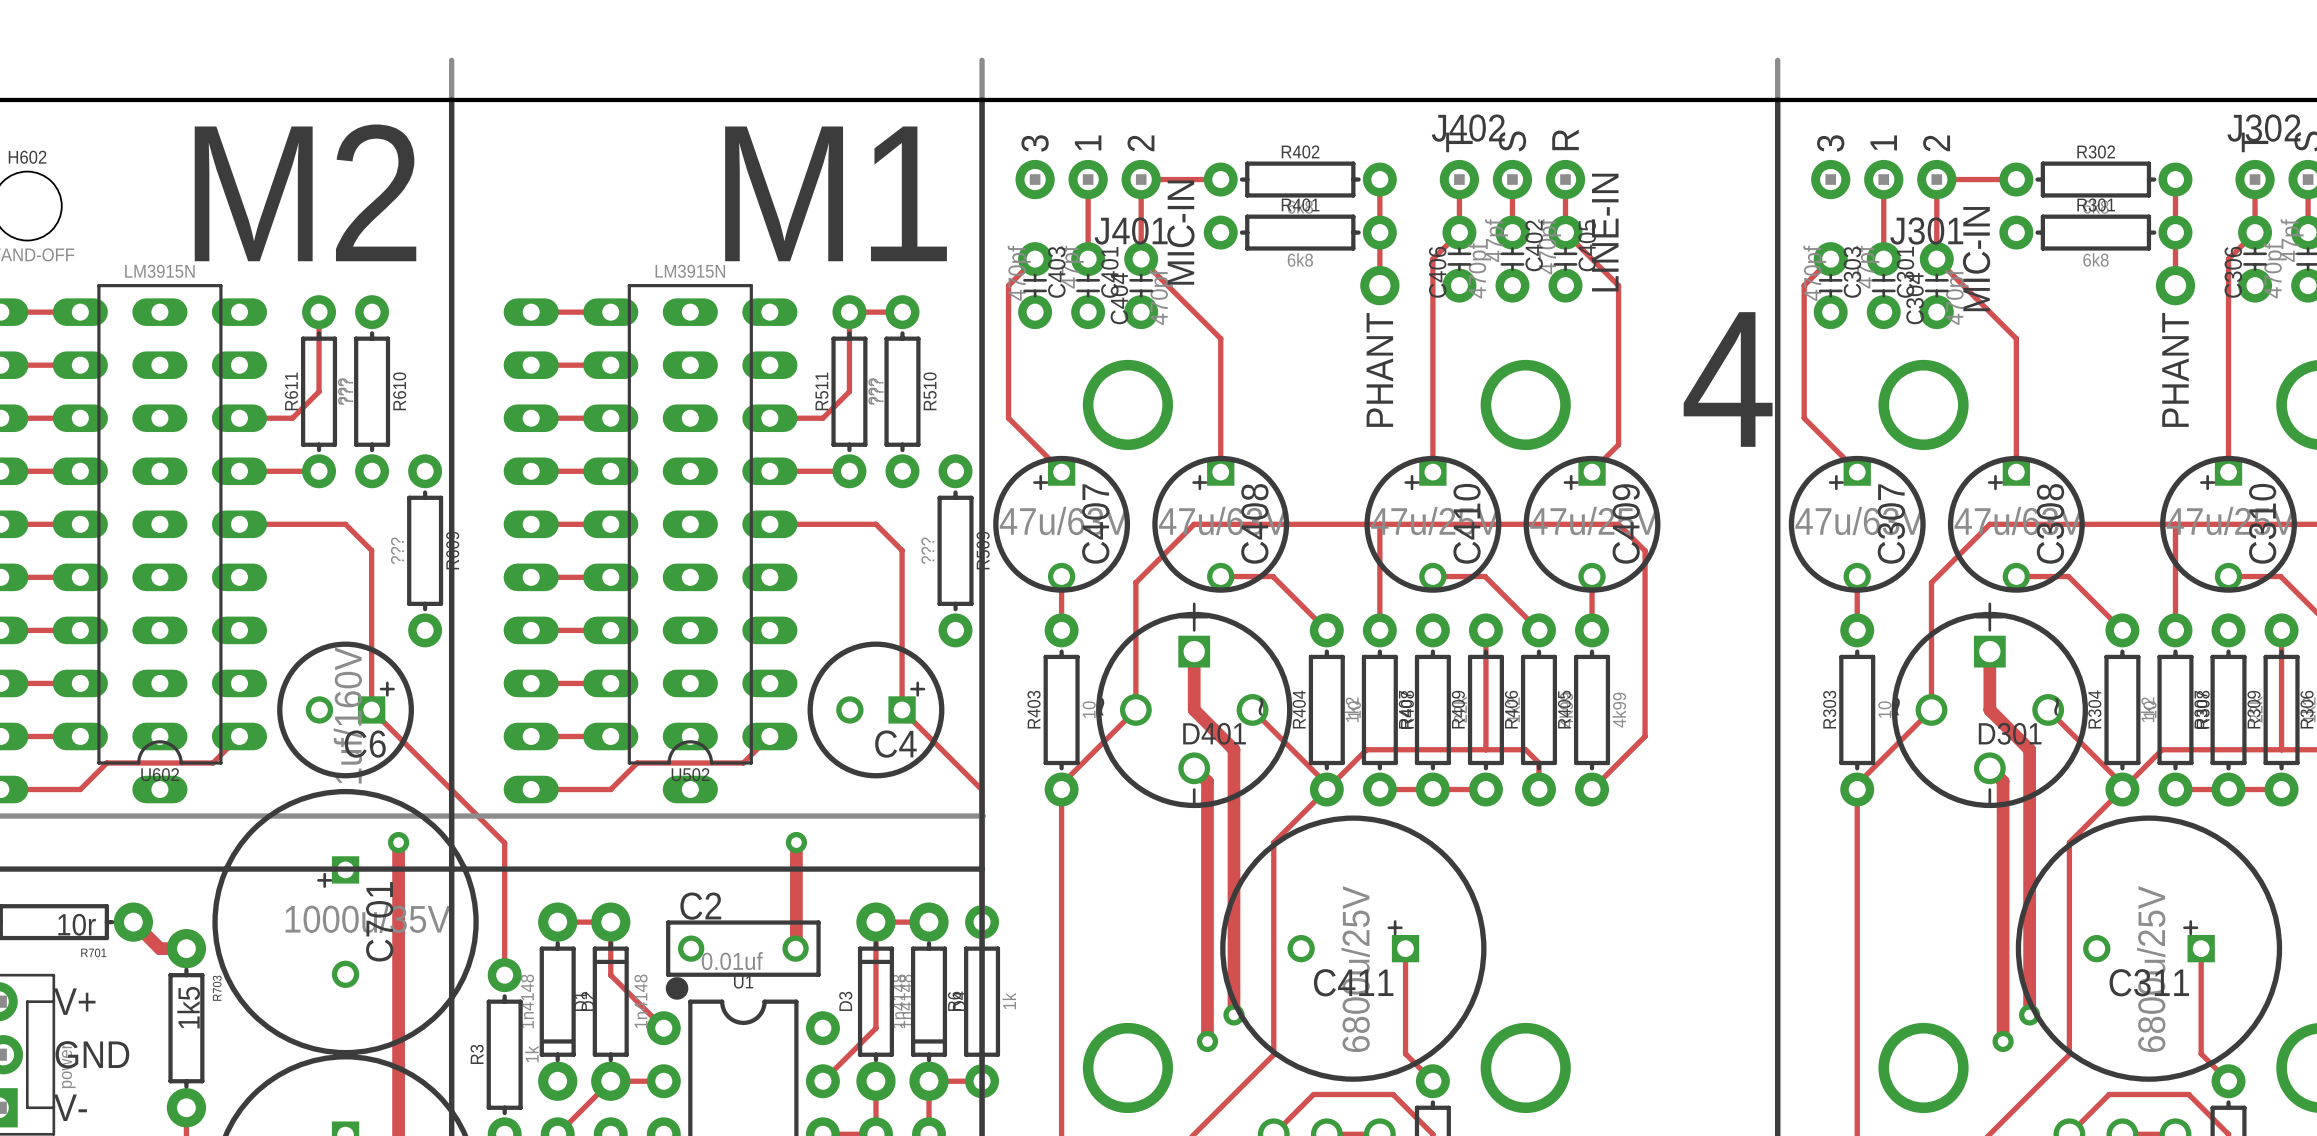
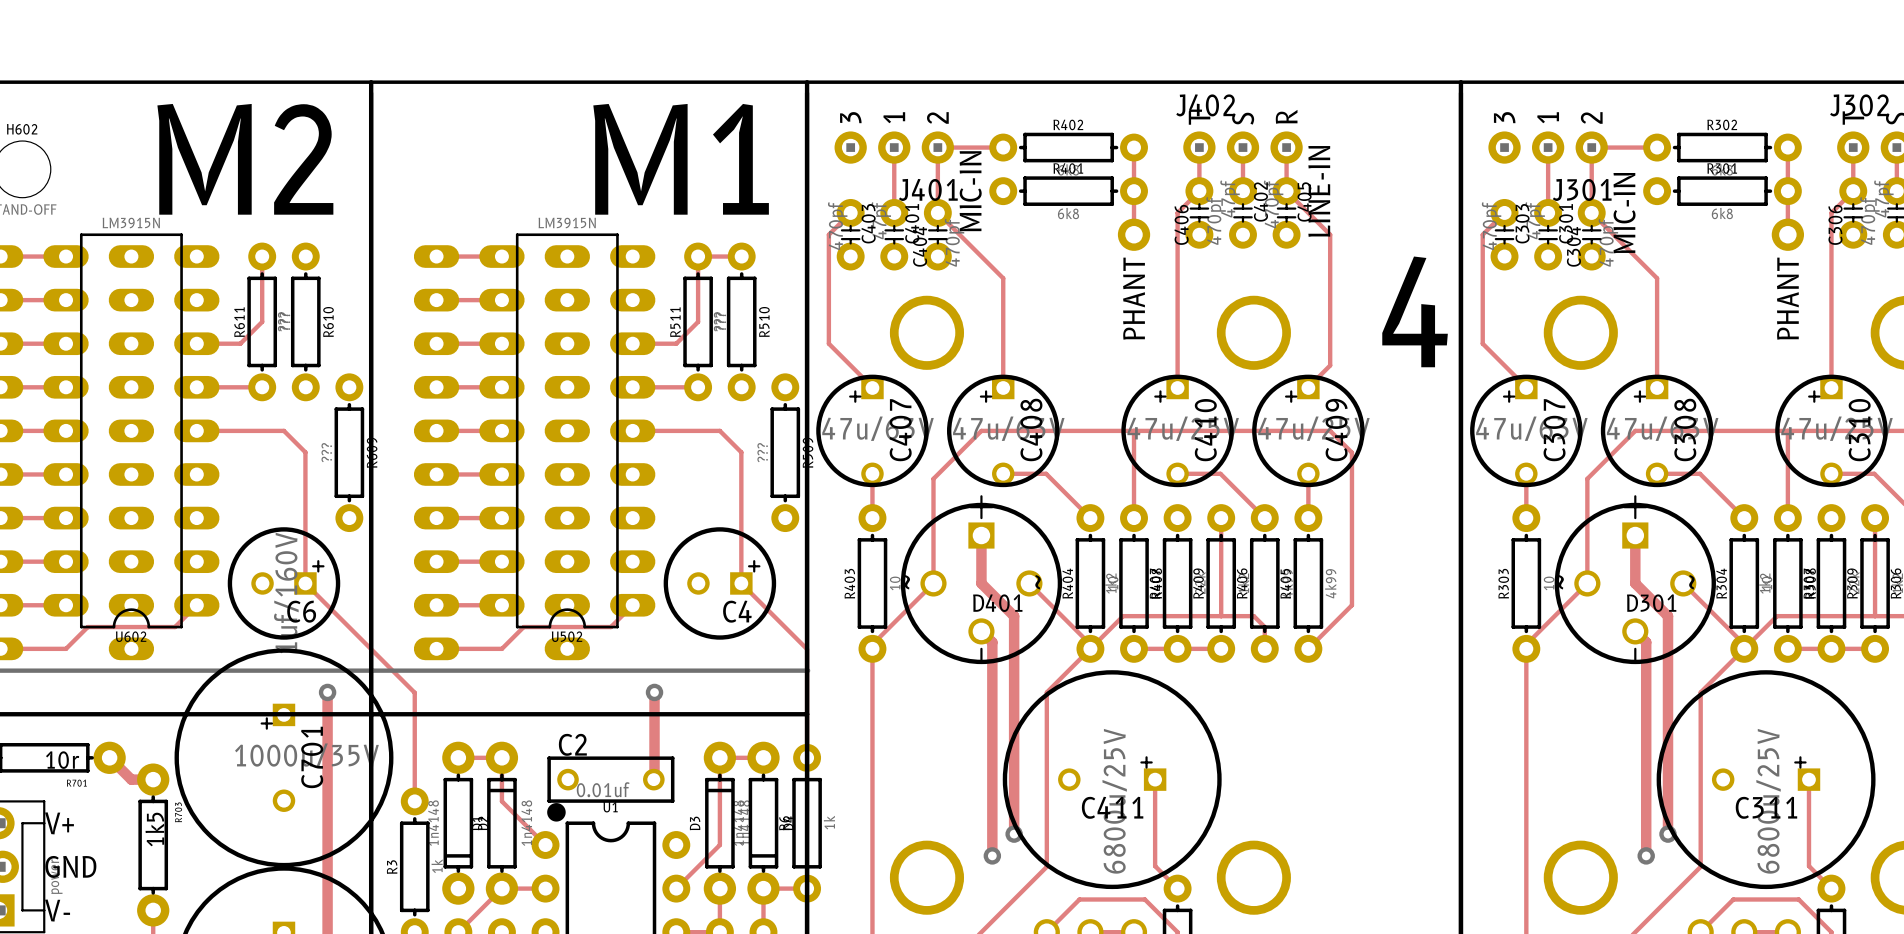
line: (451, 60) (451, 113) -> none
line: (982, 60) (982, 113) -> none
line: (1777, 60) (1777, 113) -> none

